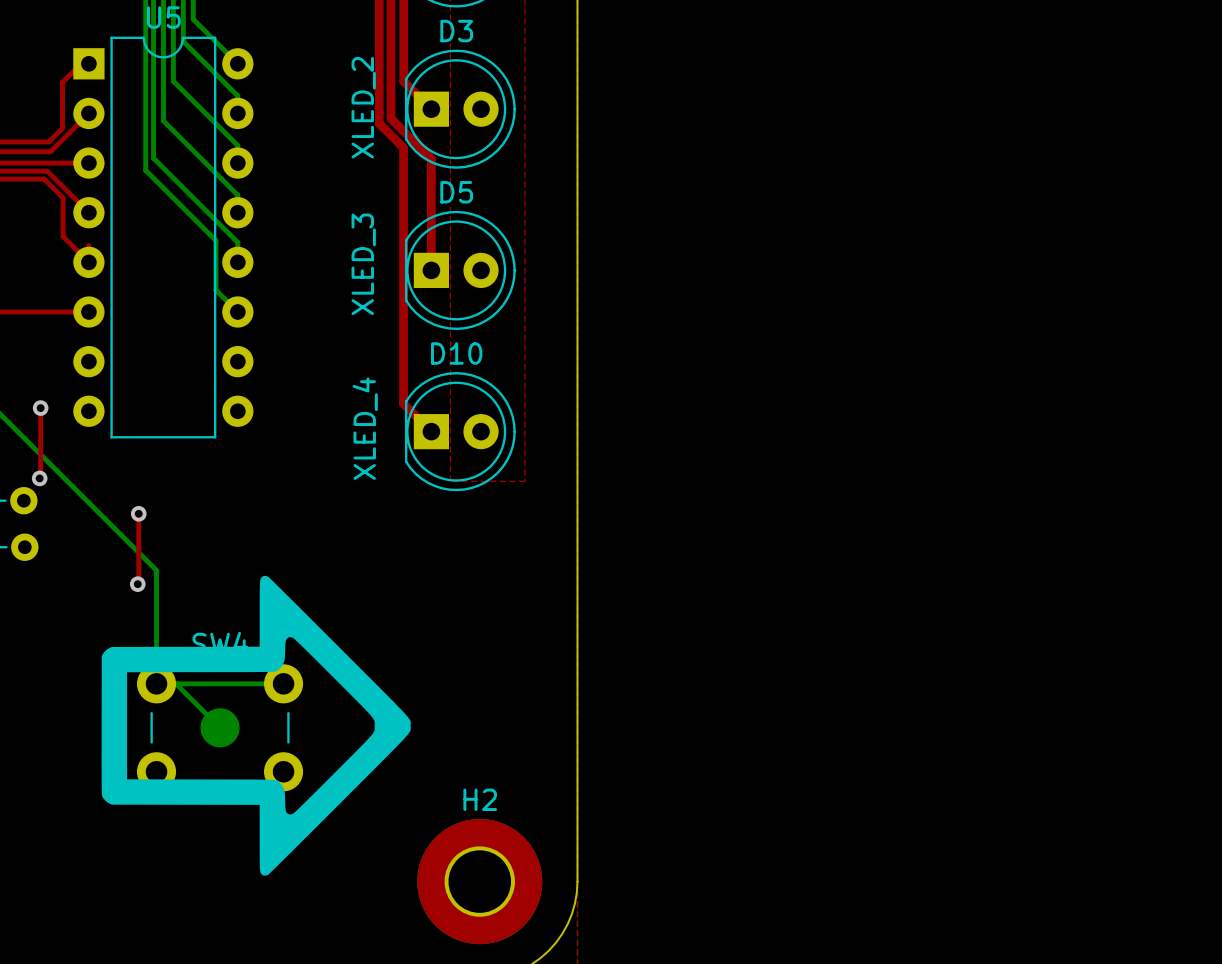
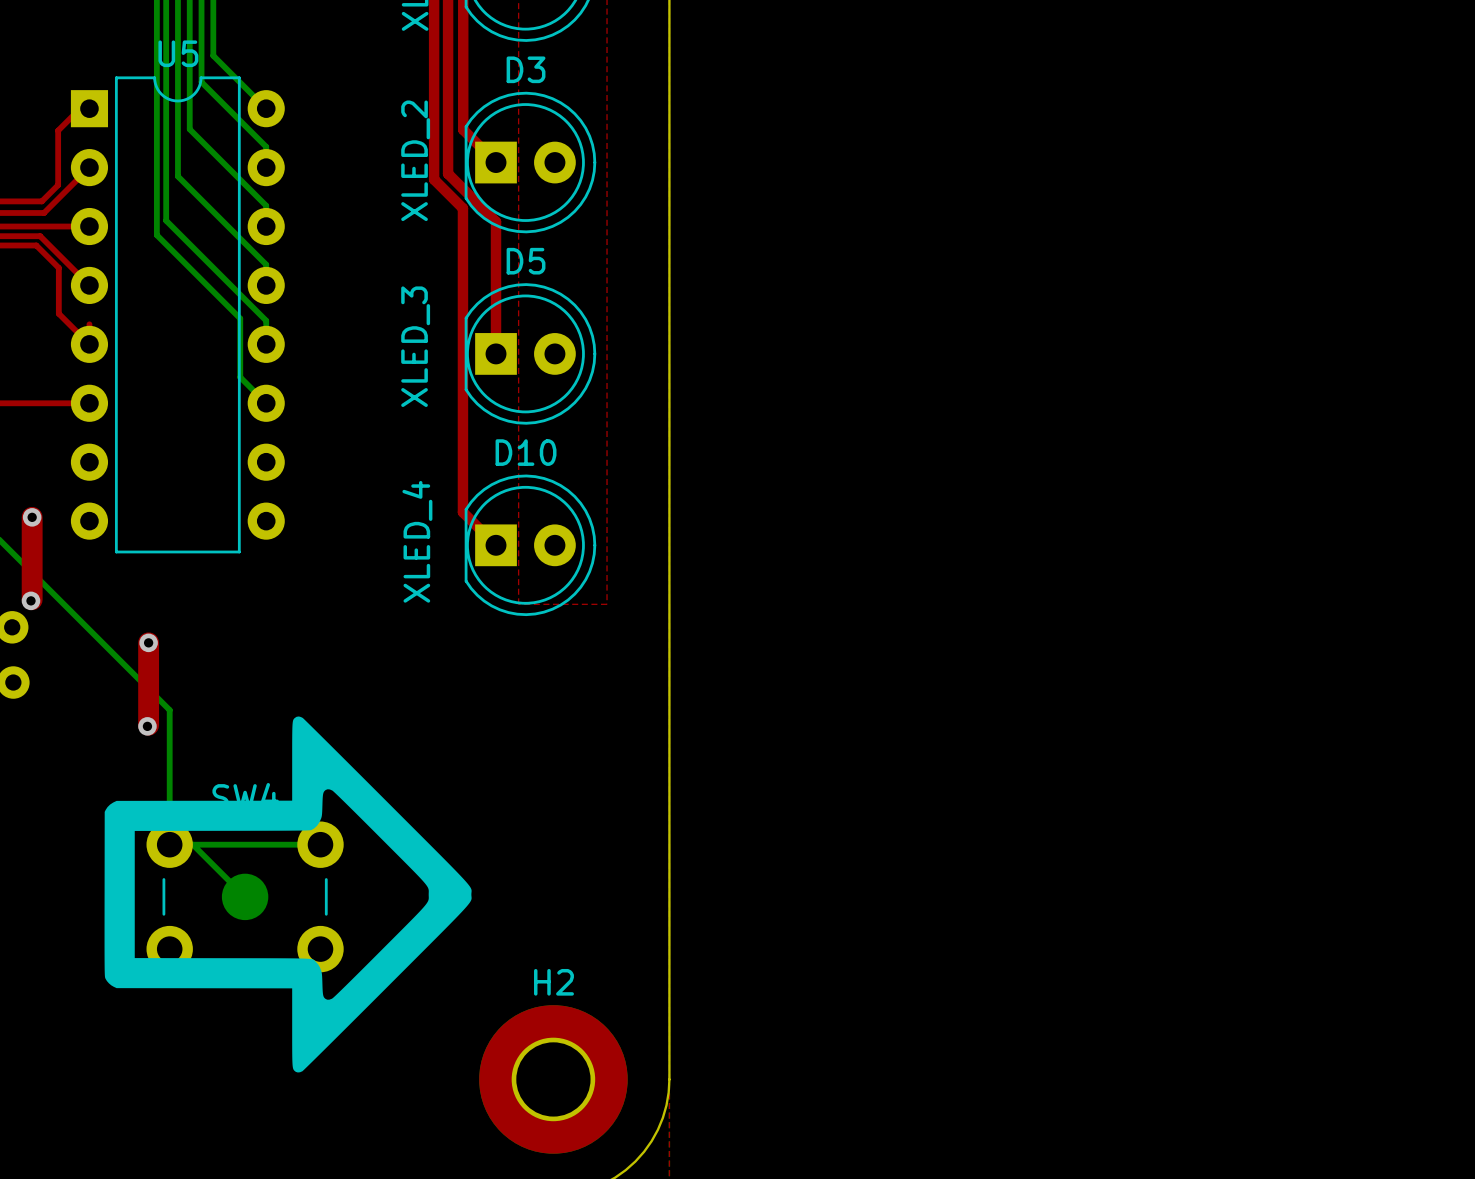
top track width: thin (40, 408) (40, 477) -> thick (32, 517) (32, 599)
top track width: thin (138, 513) (138, 583) -> thick (148, 642) (148, 725)

